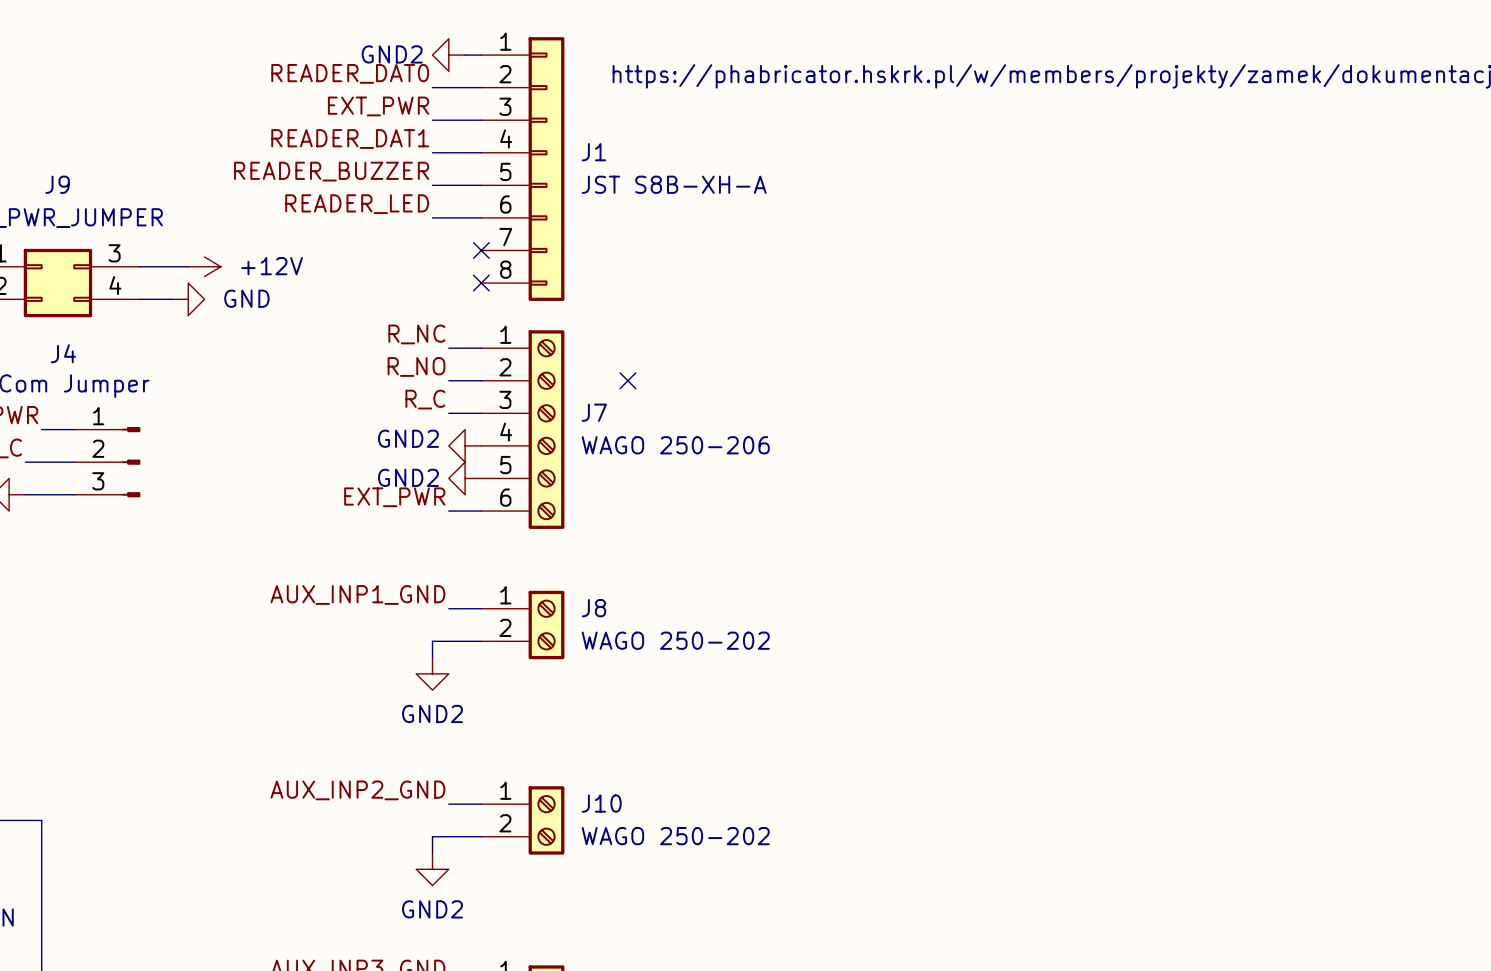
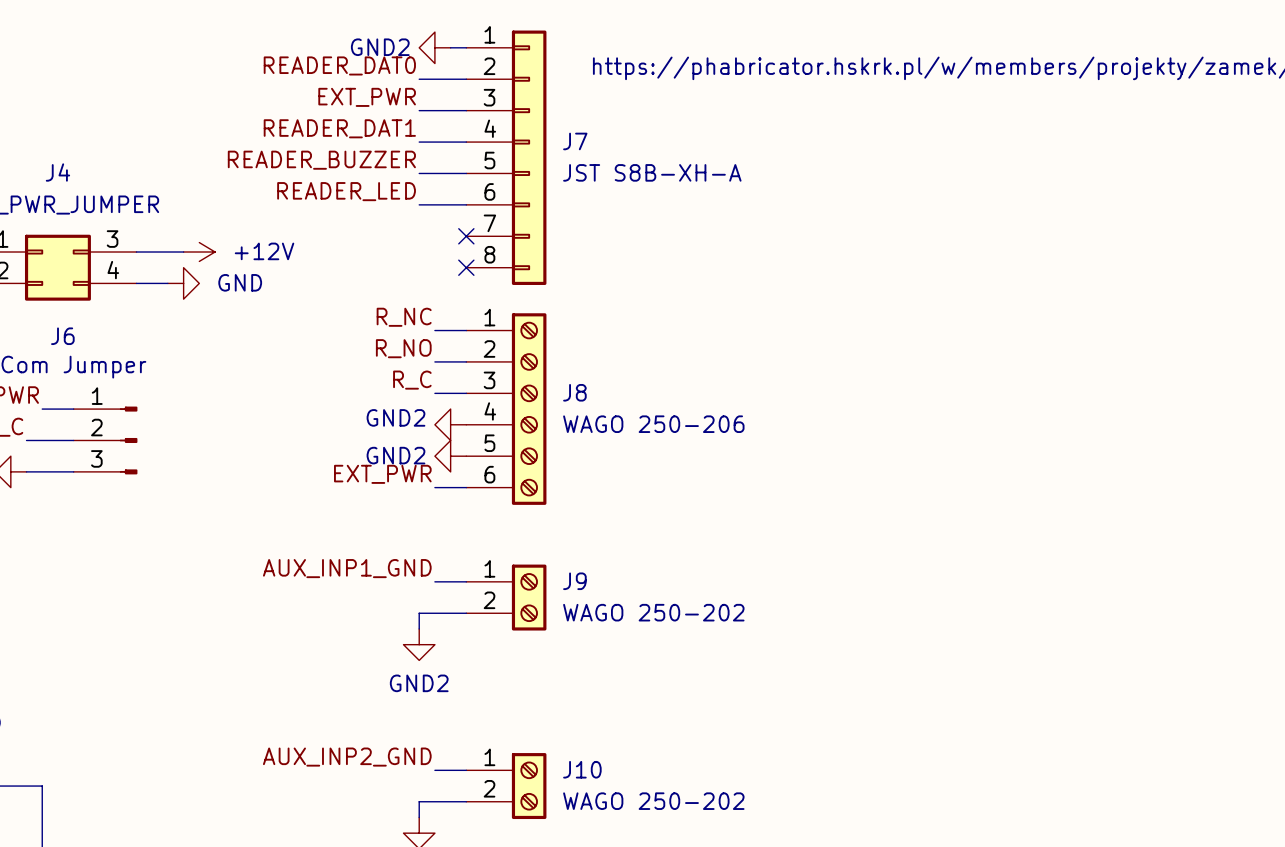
J1 name: J1 (593, 152) -> J7 (575, 141)
J9 name: J9 (57, 184) -> J4 (57, 172)
J4 name: J4 (63, 353) -> J6 (62, 336)
no-connect mark: (627, 380) -> none
J7 name: J7 (594, 412) -> J8 (574, 392)
J8 name: J8 (593, 608) -> J9 (574, 581)

